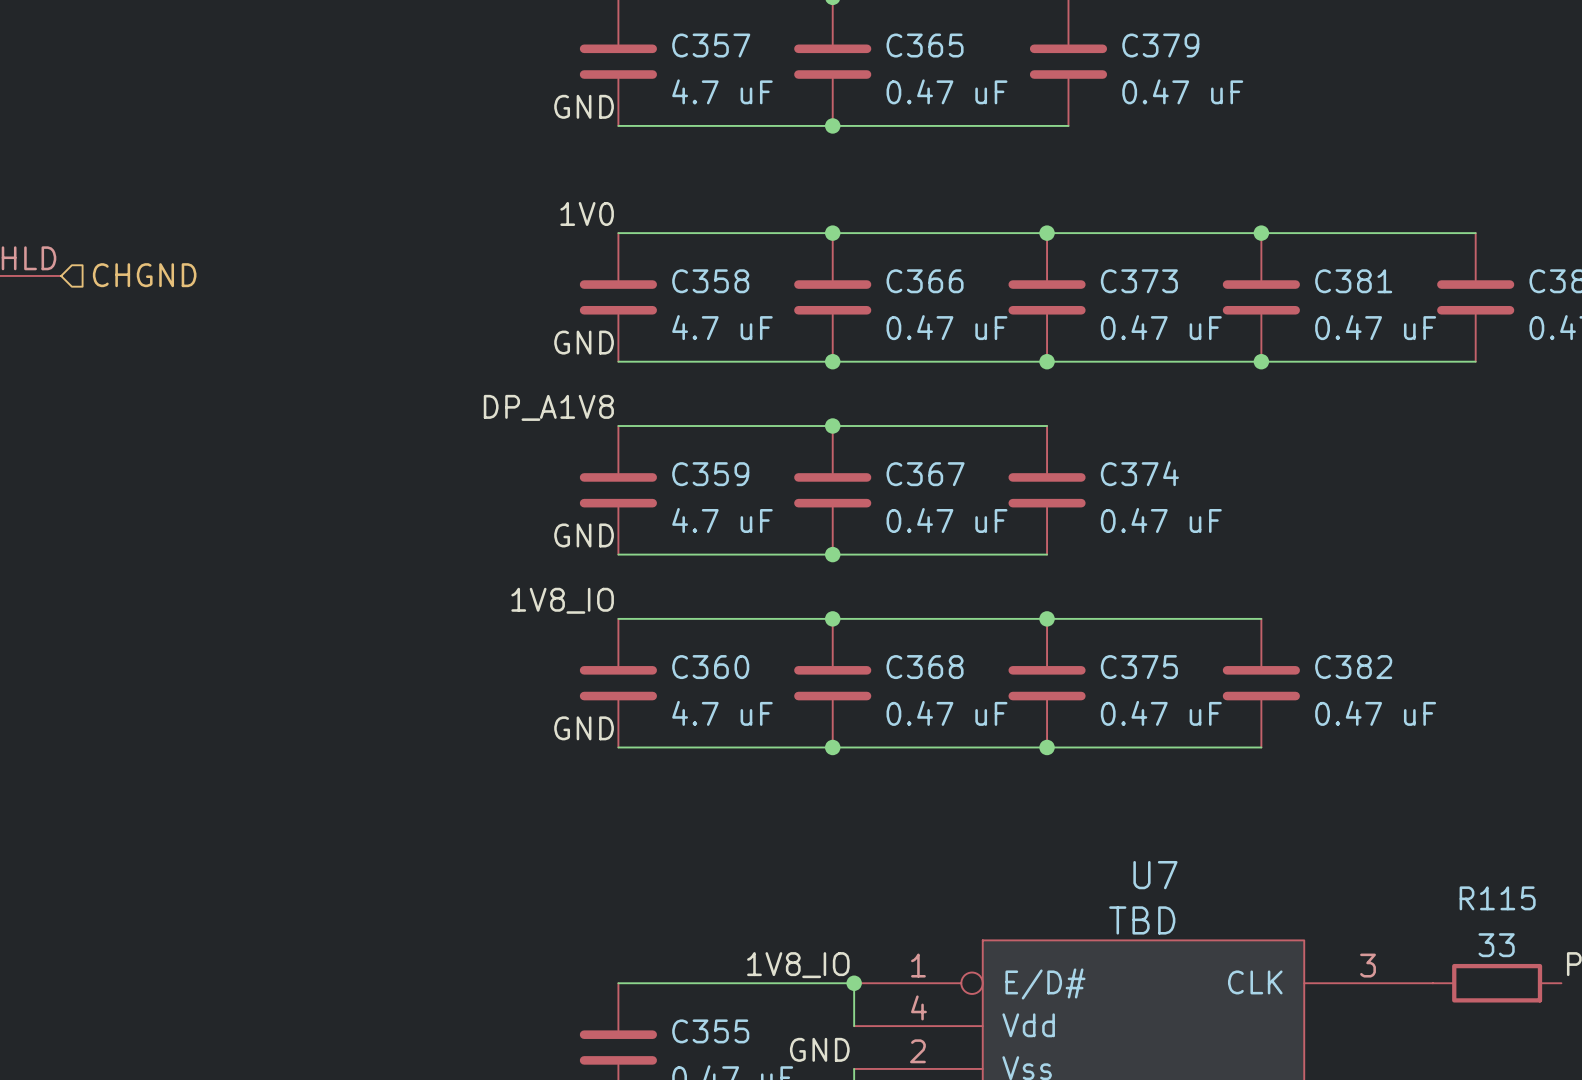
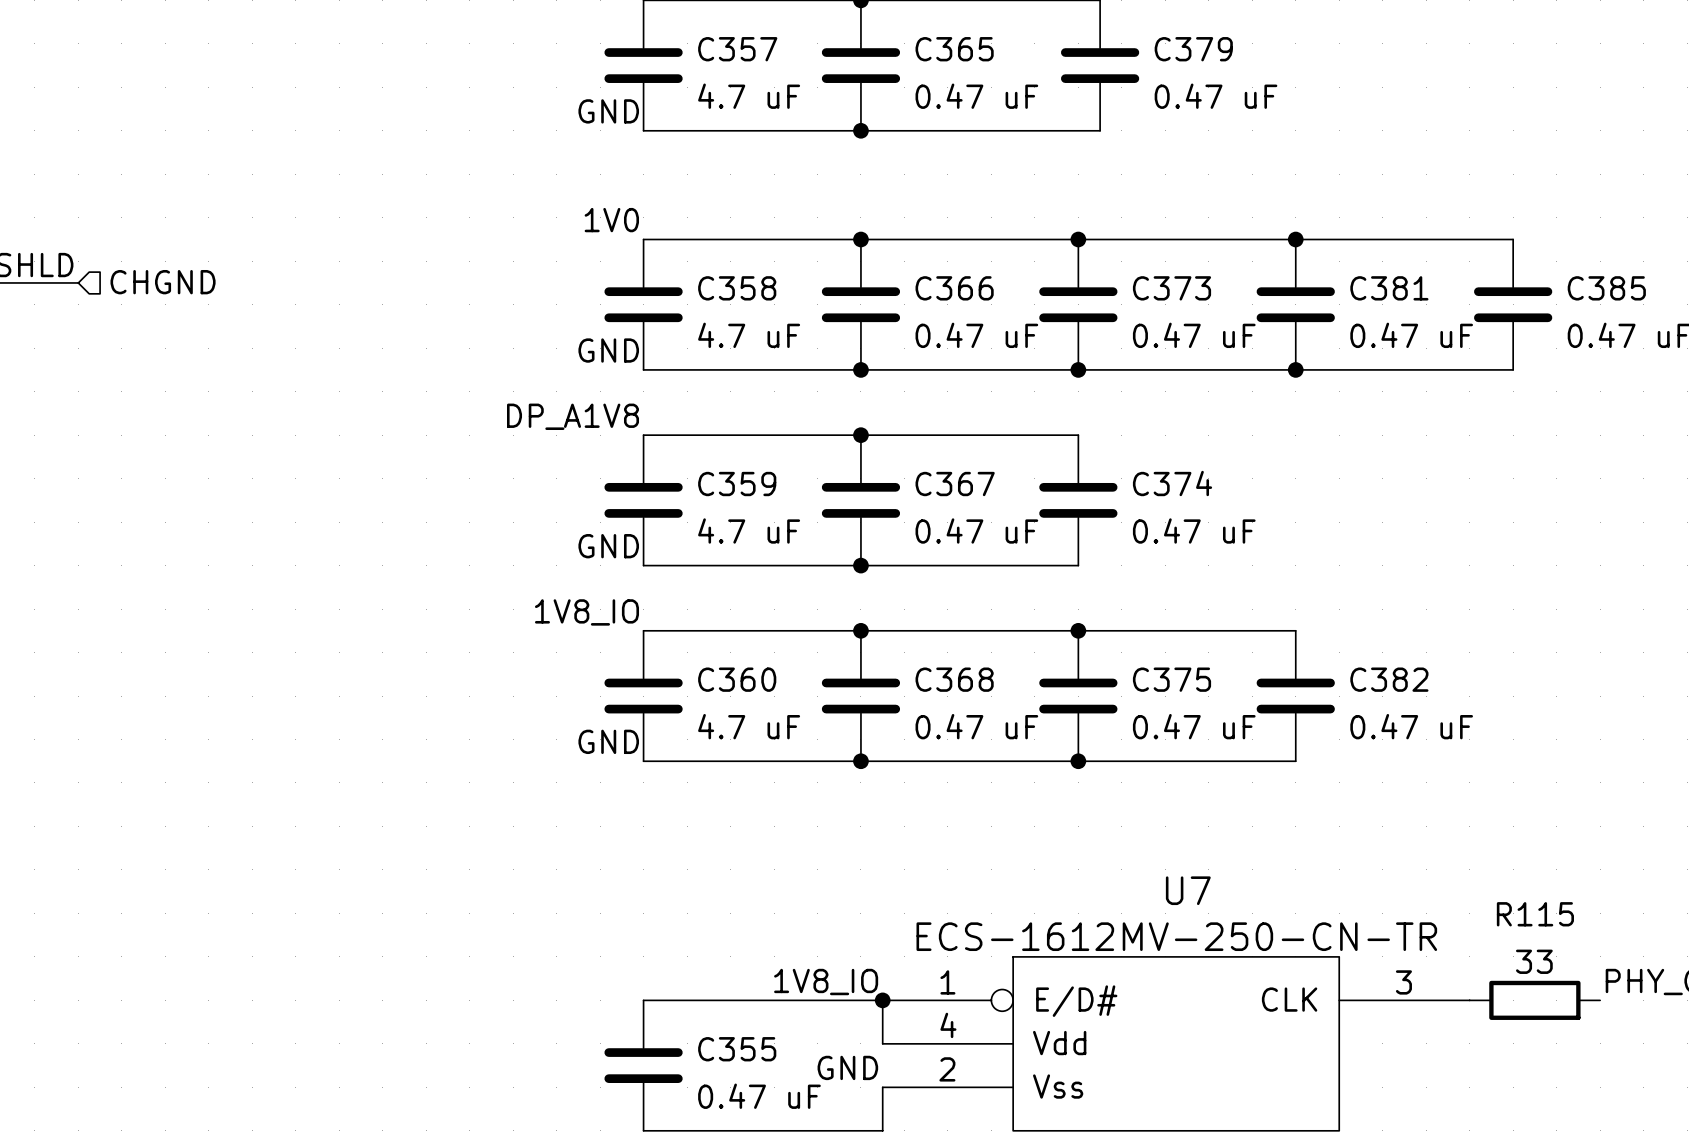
U7 value: TBD (1142, 920) -> ECS-1612MV-250-CN-TR (1176, 936)

